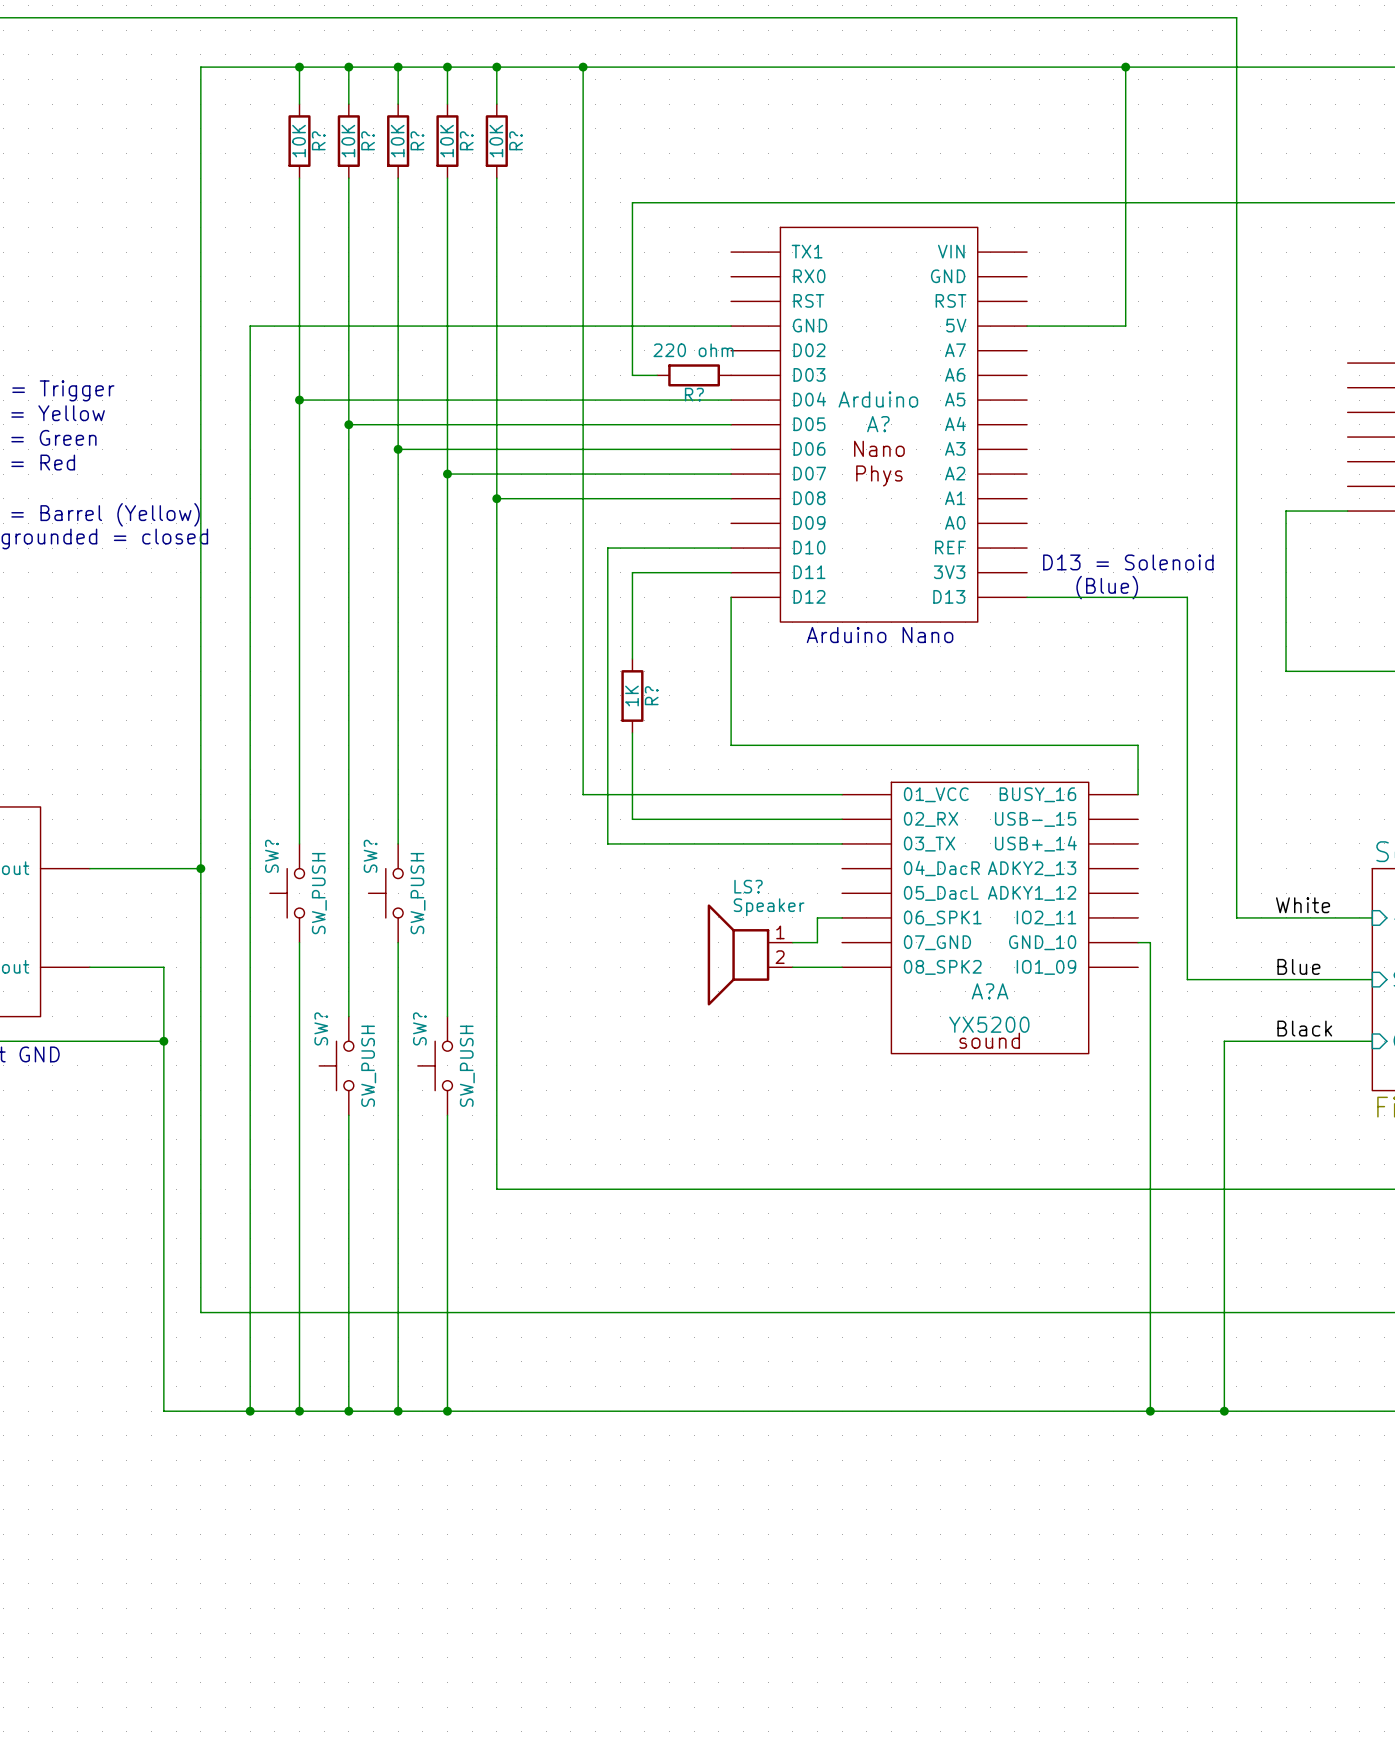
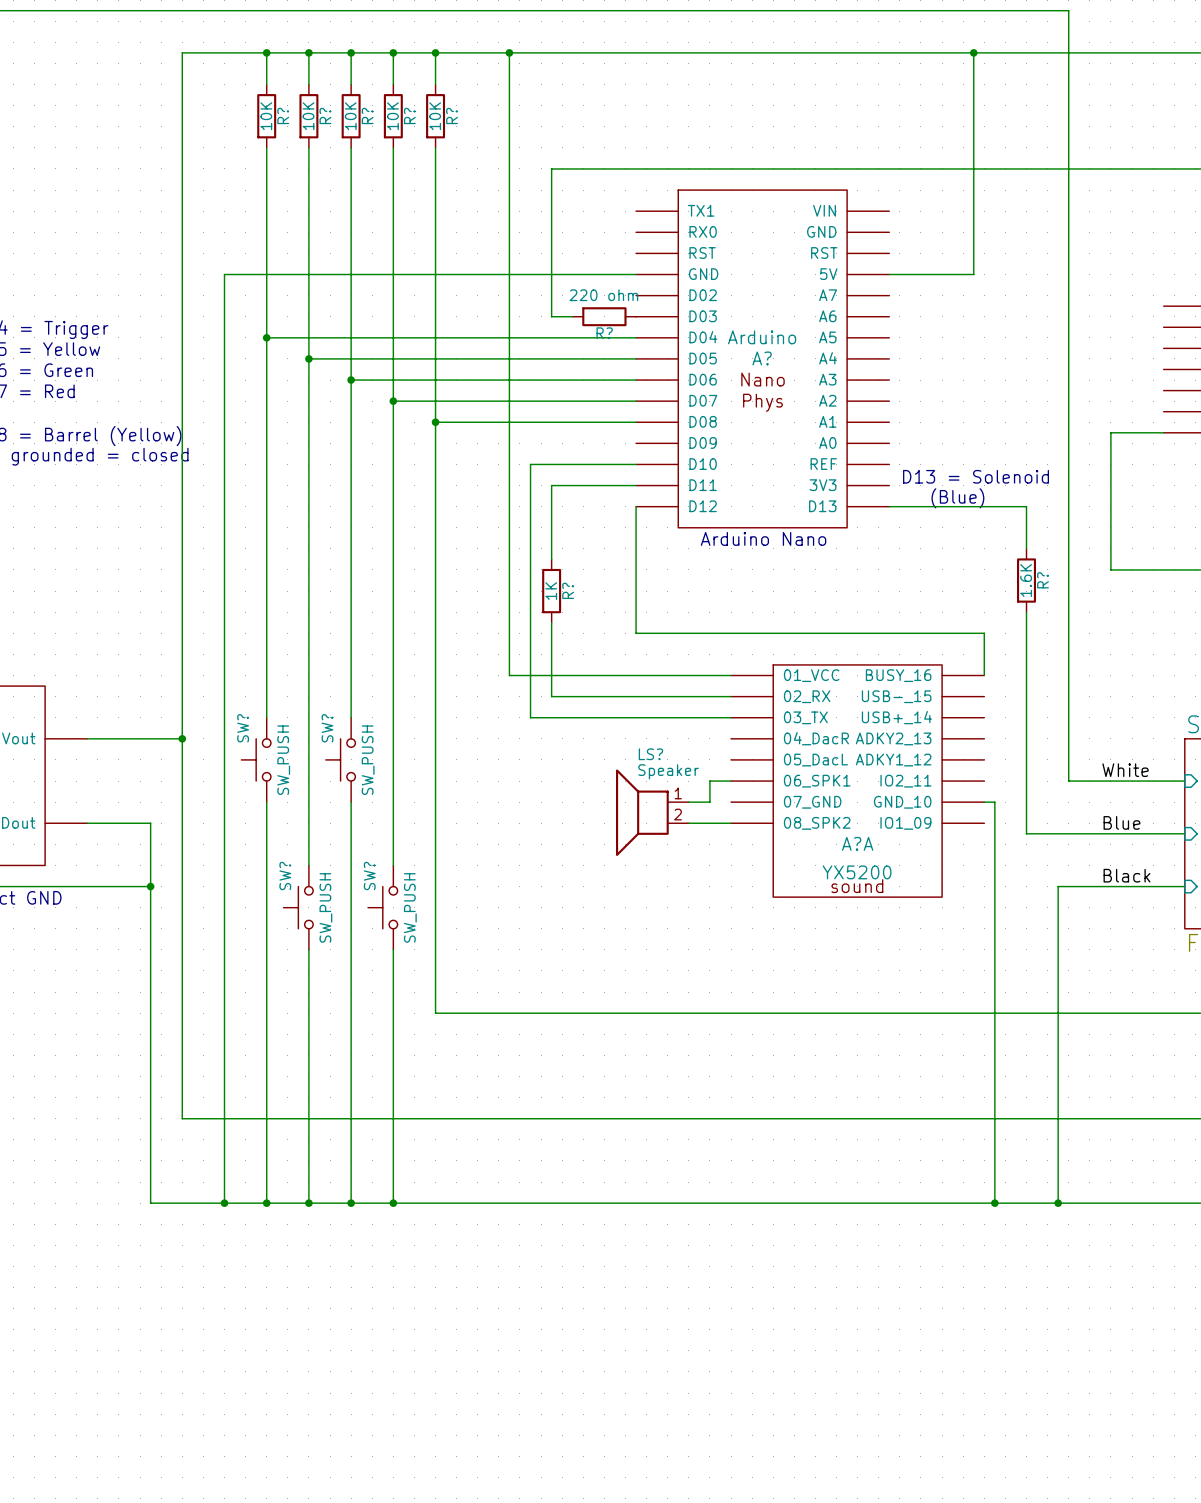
wire: (1187, 646) (1187, 720) -> none
R?: none -> 1.6K (1026, 580)

